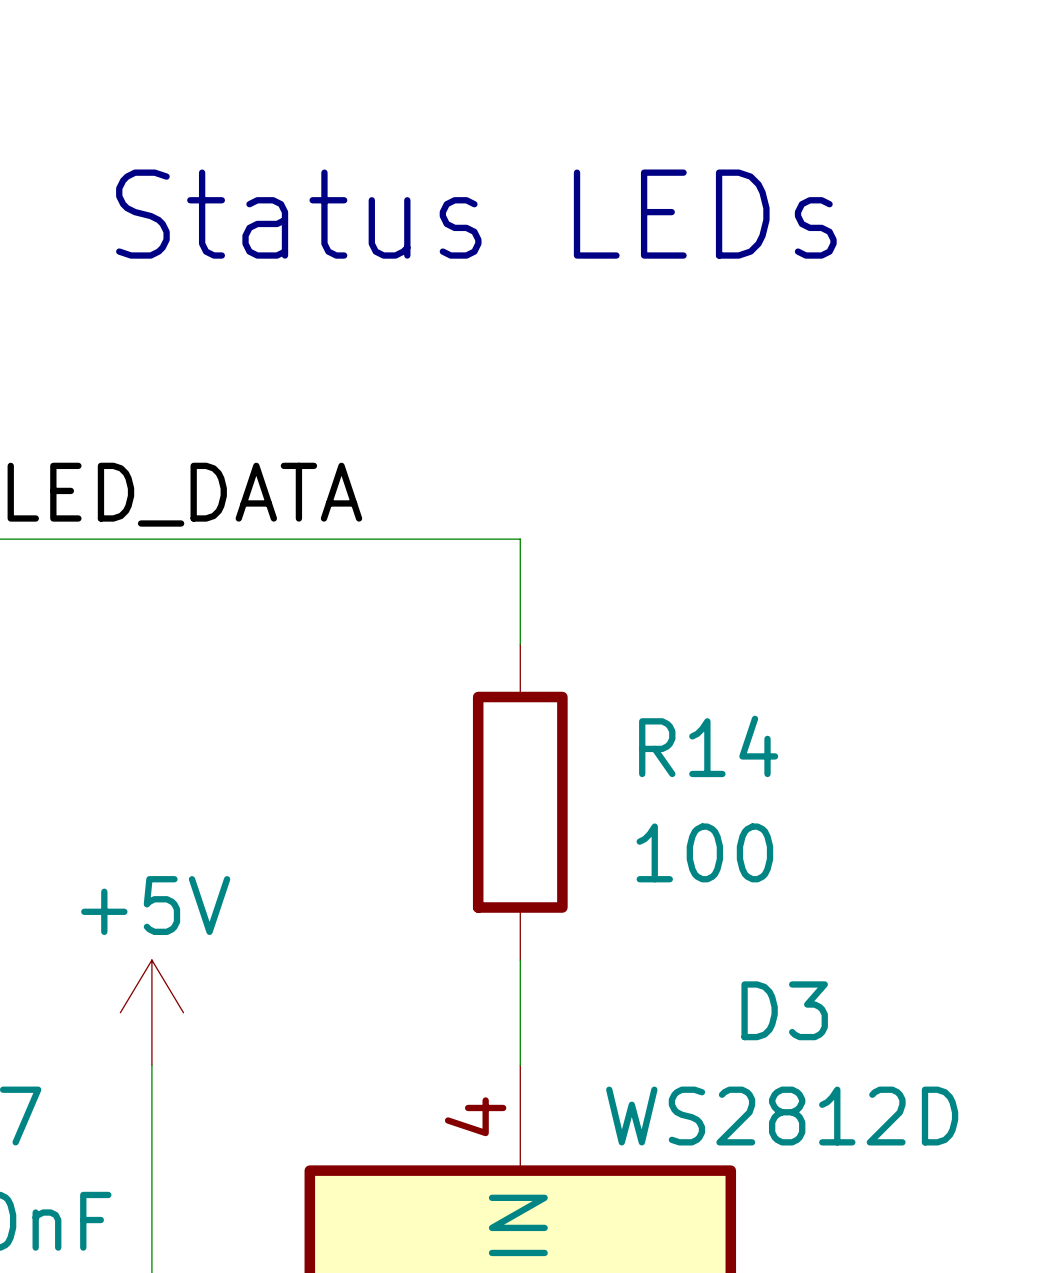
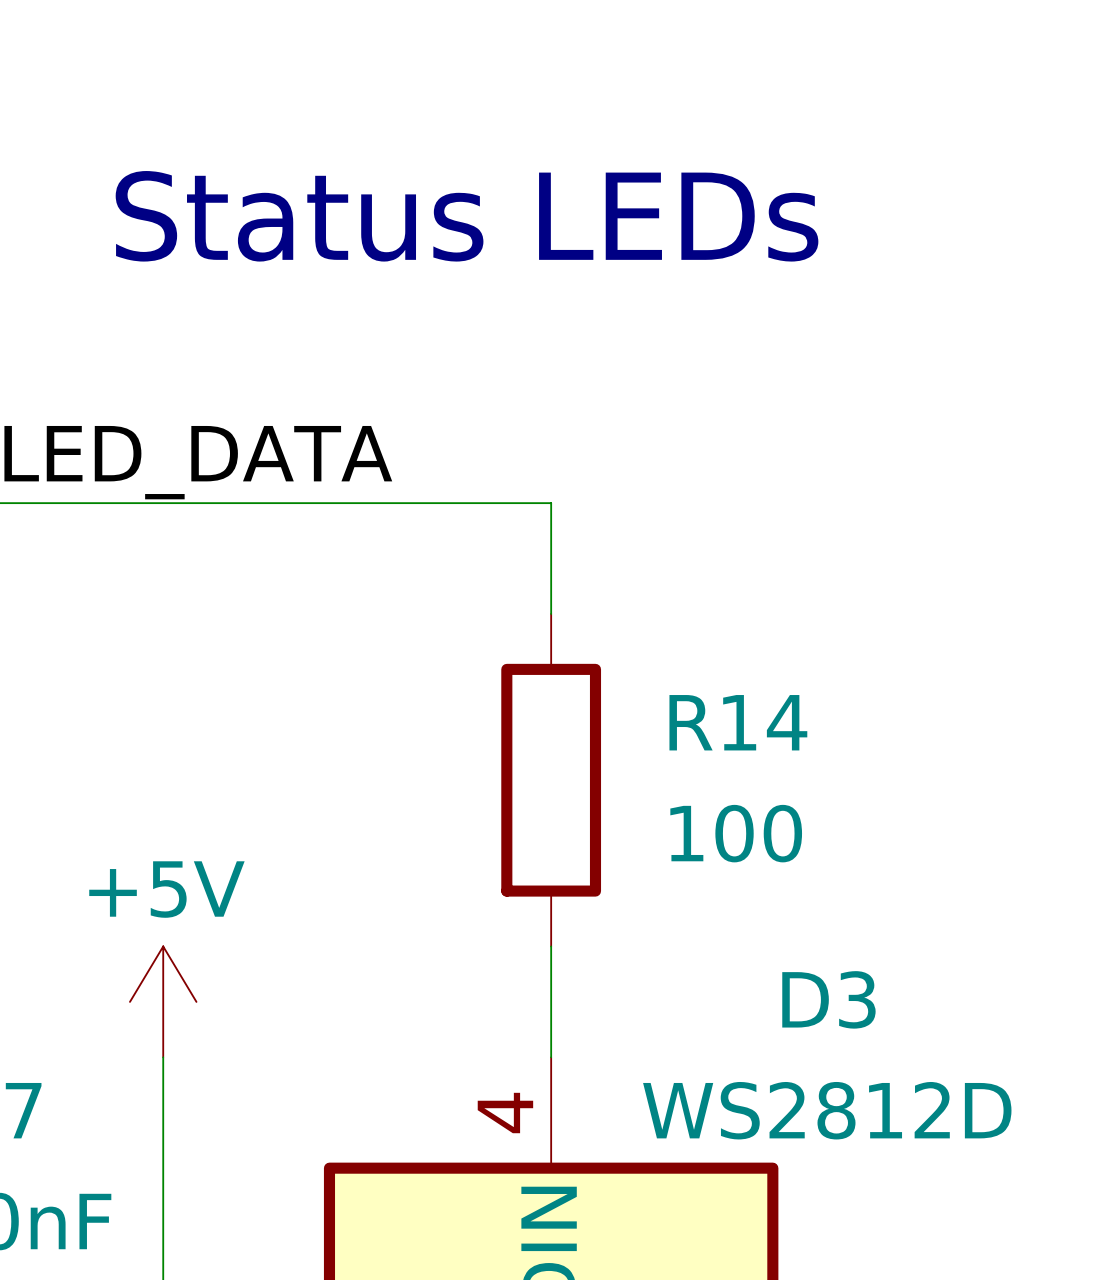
text position: Status LEDs (476, 214) -> Status LEDs (467, 216)

